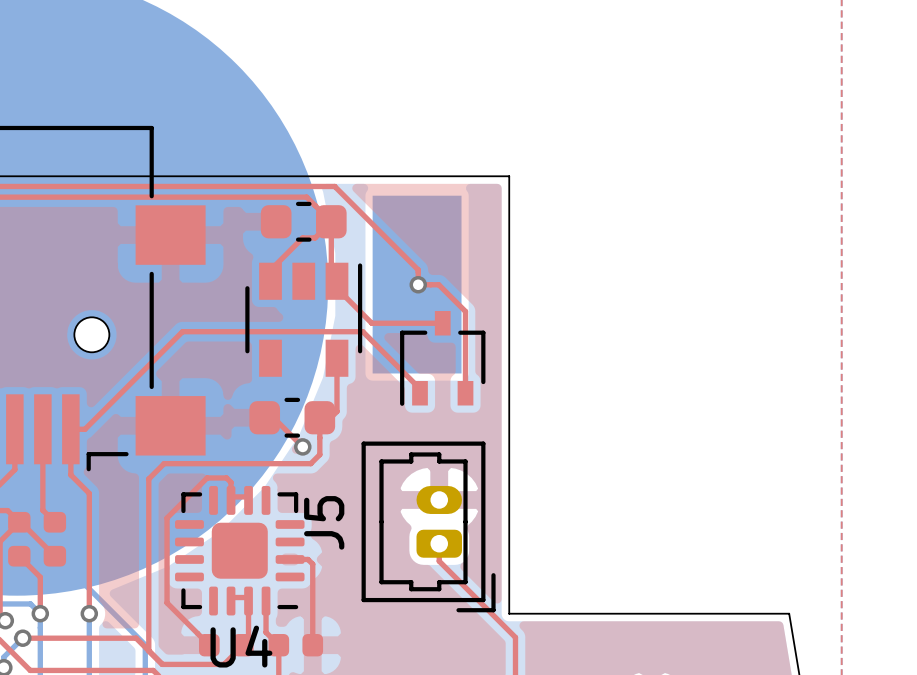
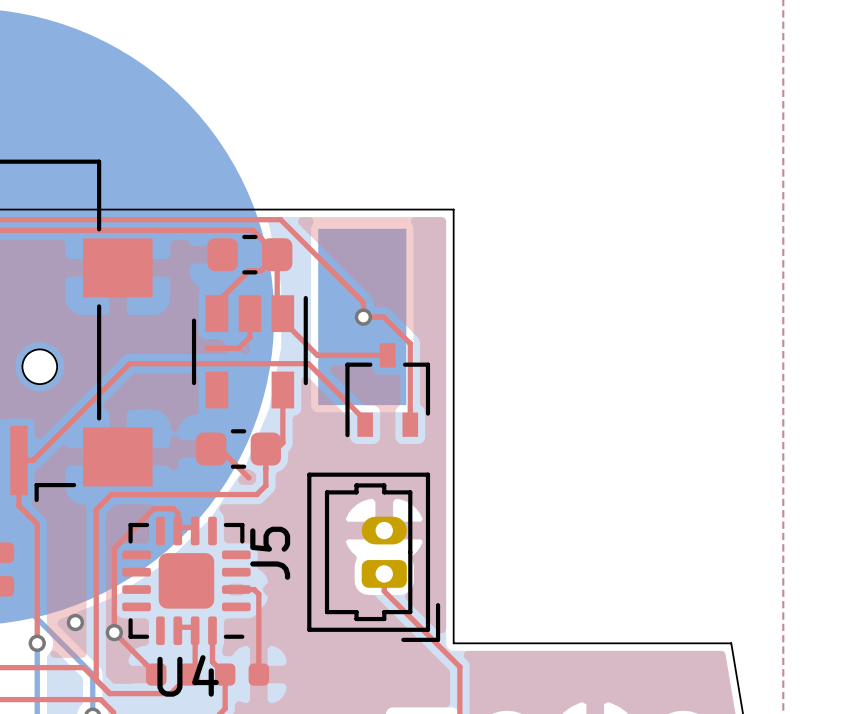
top track: none -> (249, 313) (249, 337) (238, 348) (207, 348)
via: (302, 446) -> none
via: none -> (75, 622)
via: none -> (114, 632)

